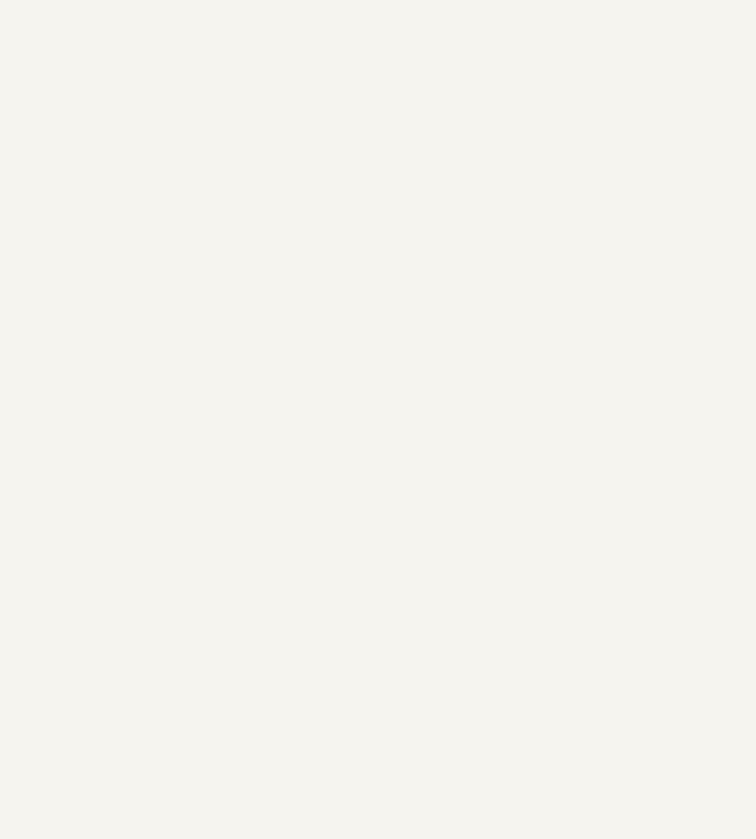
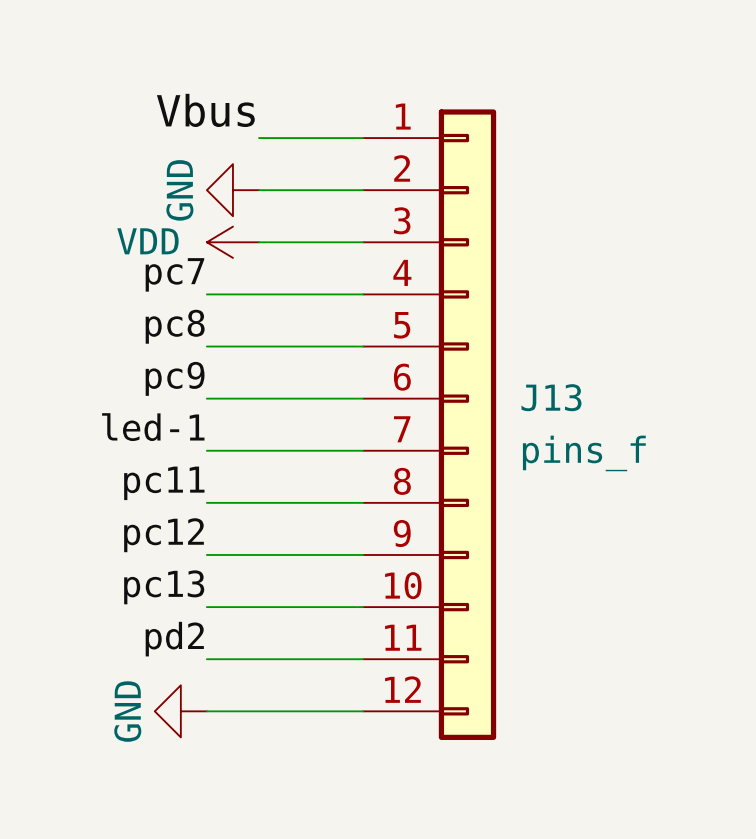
label: none -> Vbus (205, 110)
wire: none -> (259, 138) (363, 138)
power symbol: none -> GND (232, 190)
wire: none -> (259, 190) (363, 190)
power symbol: none -> VDD (232, 242)
wire: none -> (259, 242) (363, 242)
label: none -> pc7 (174, 274)
wire: none -> (206, 294) (363, 294)
label: none -> pc8 (175, 326)
wire: none -> (206, 346) (363, 346)
label: none -> pc9 (175, 378)
wire: none -> (206, 398) (363, 398)
J13: none -> pins_f (429, 424)
label: none -> led-1 (153, 427)
wire: none -> (206, 450) (363, 450)
label: none -> pc11 (164, 483)
wire: none -> (206, 502) (363, 502)
label: none -> pc12 (164, 535)
wire: none -> (206, 554) (363, 554)
label: none -> pc13 (164, 587)
wire: none -> (206, 607) (363, 607)
label: none -> pd2 (174, 639)
wire: none -> (206, 659) (363, 659)
power symbol: none -> GND (180, 711)
wire: none -> (206, 711) (363, 711)

